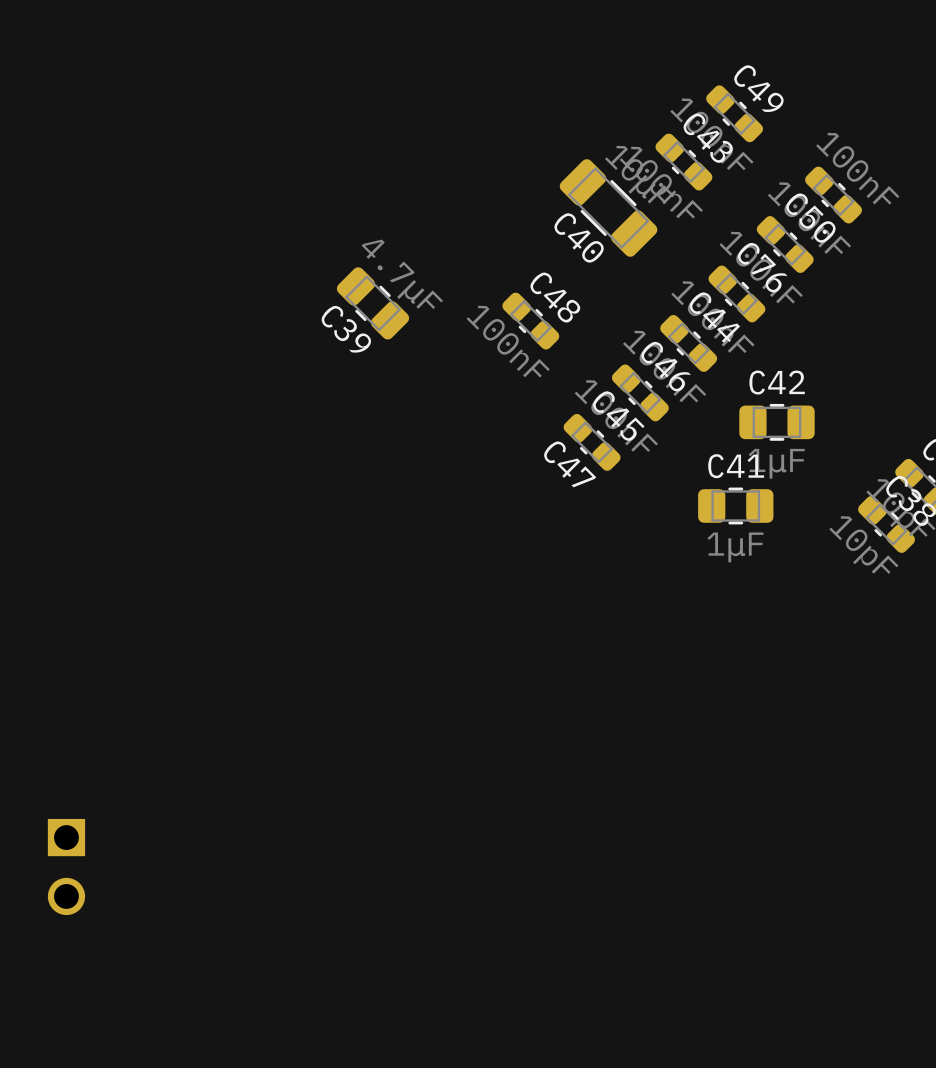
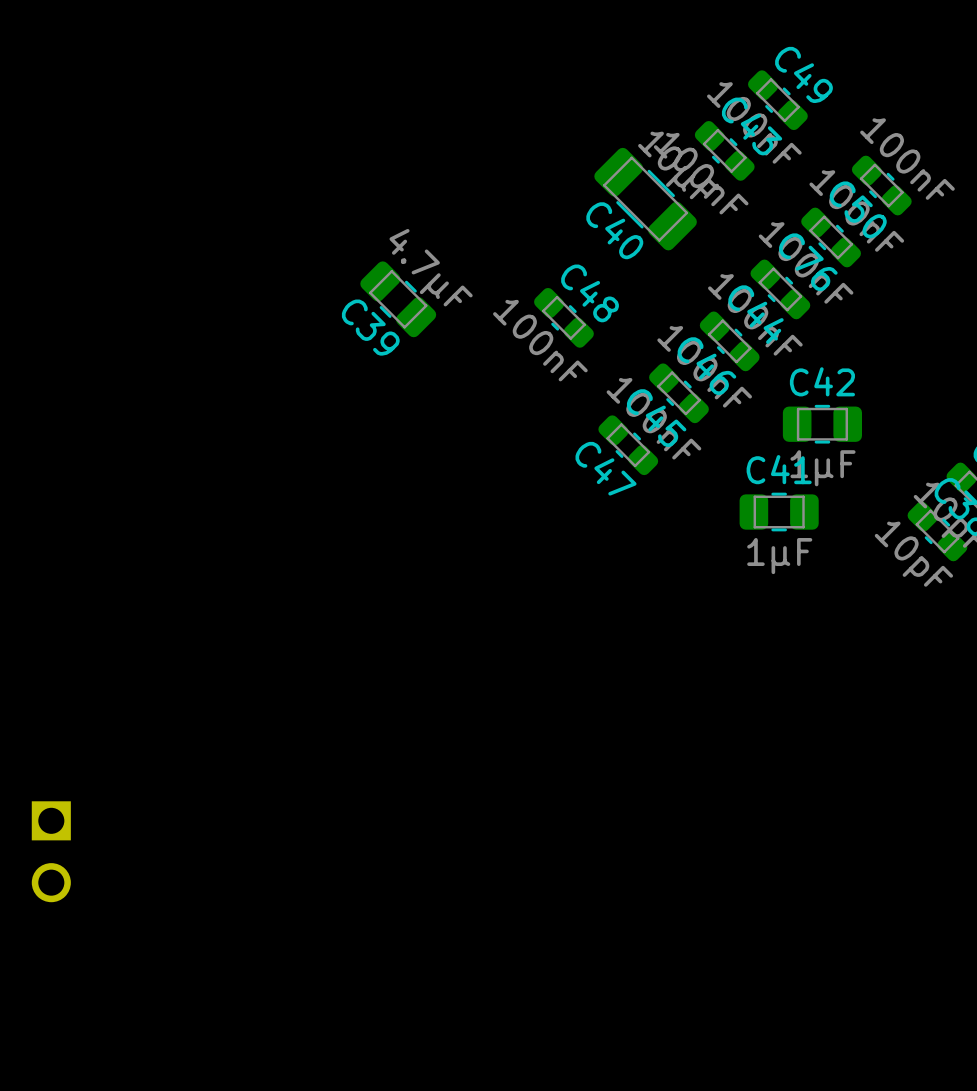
part position: (66, 867) -> (51, 851)

